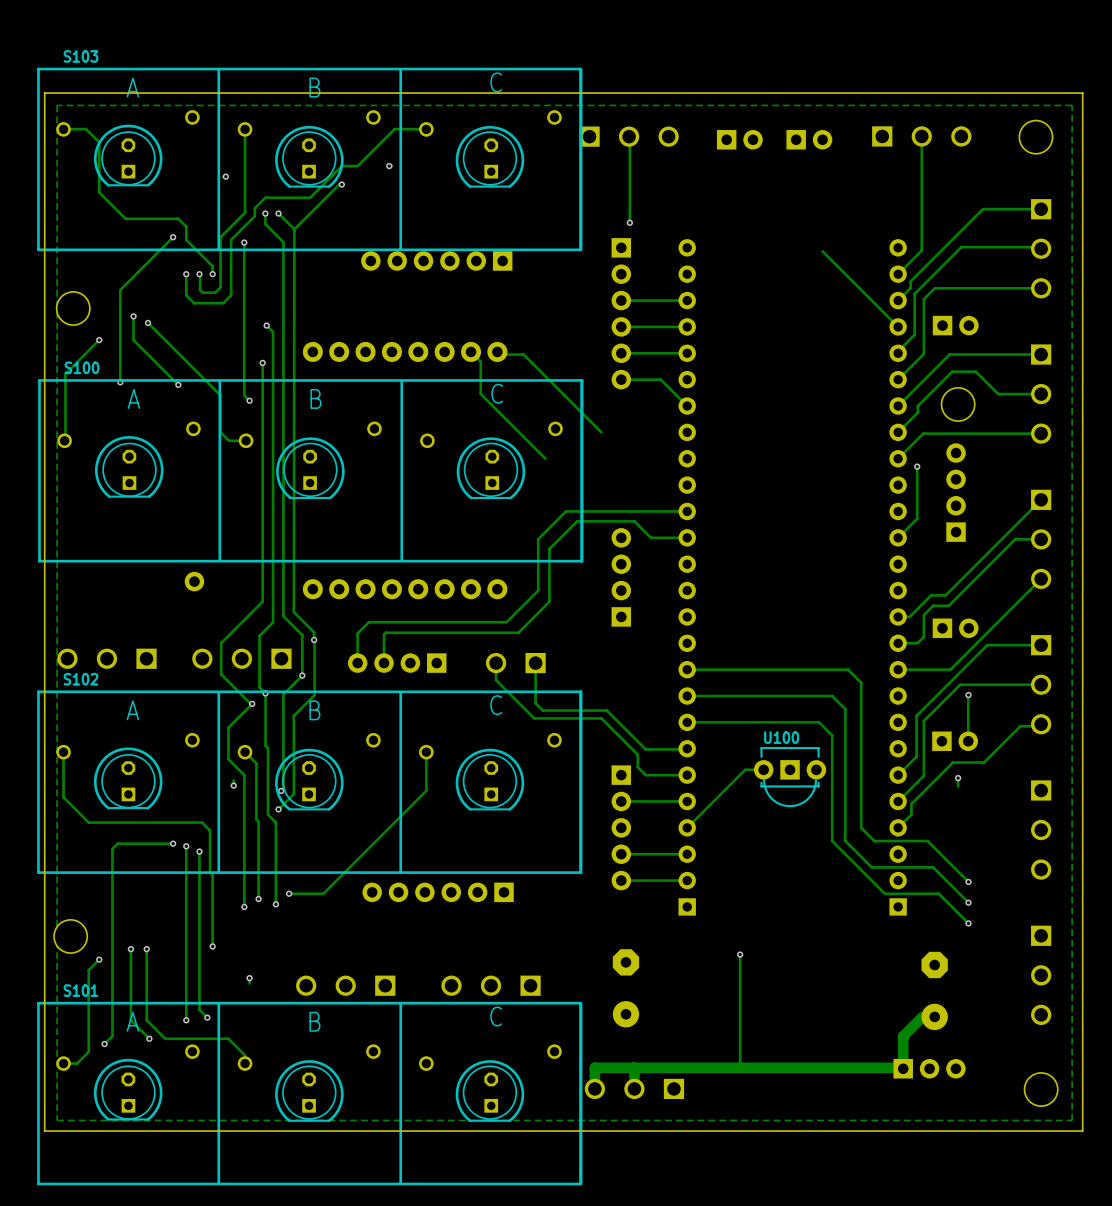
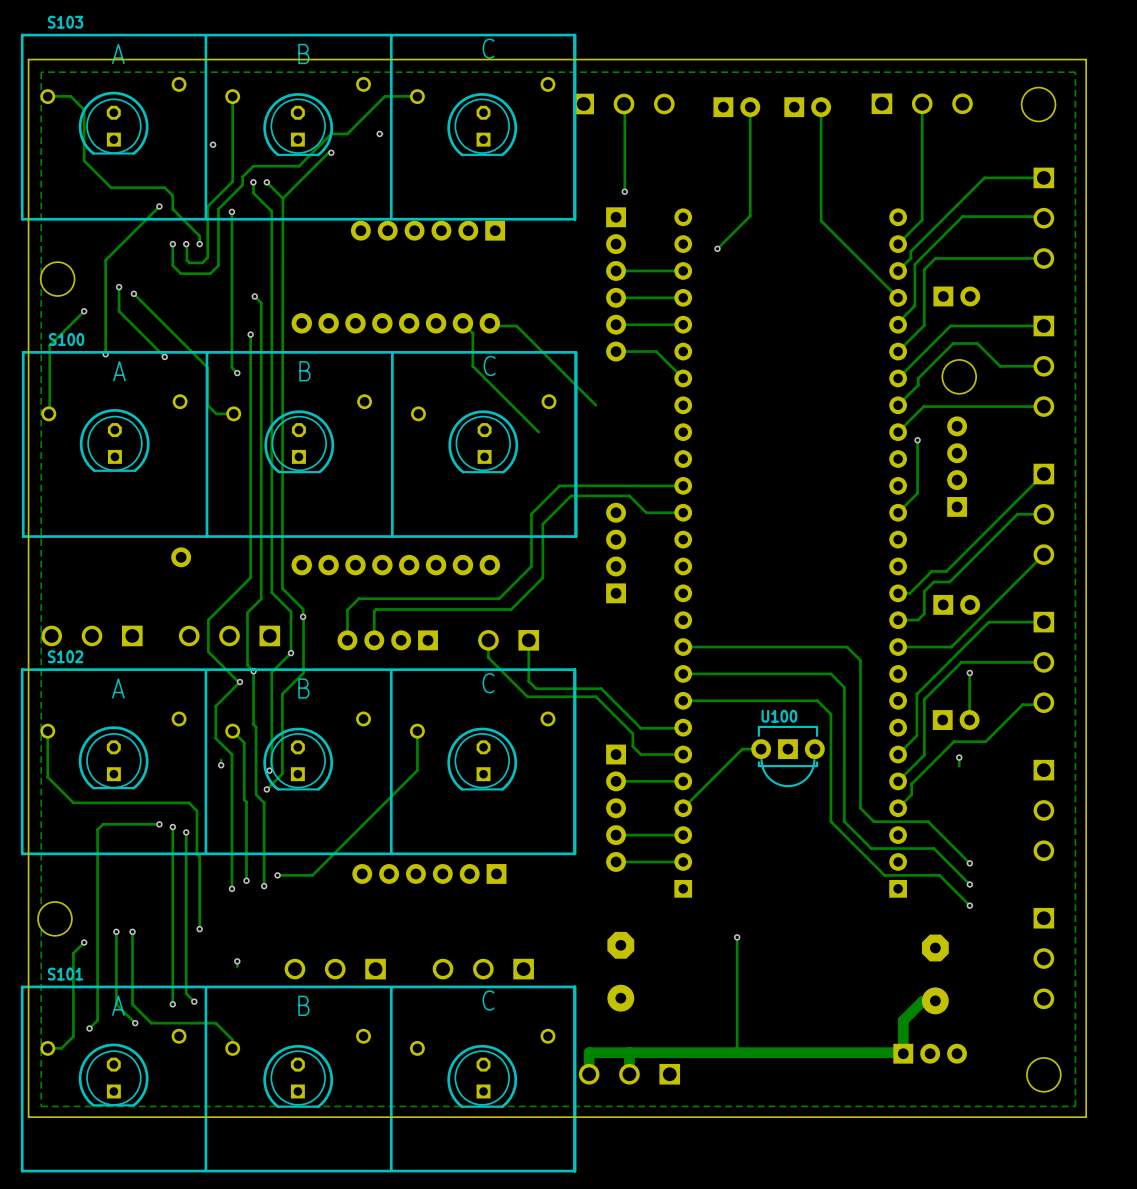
track: none -> (750, 107) (750, 216) (717, 248)
track: none -> (821, 107) (821, 220)
via: none -> (717, 248)

